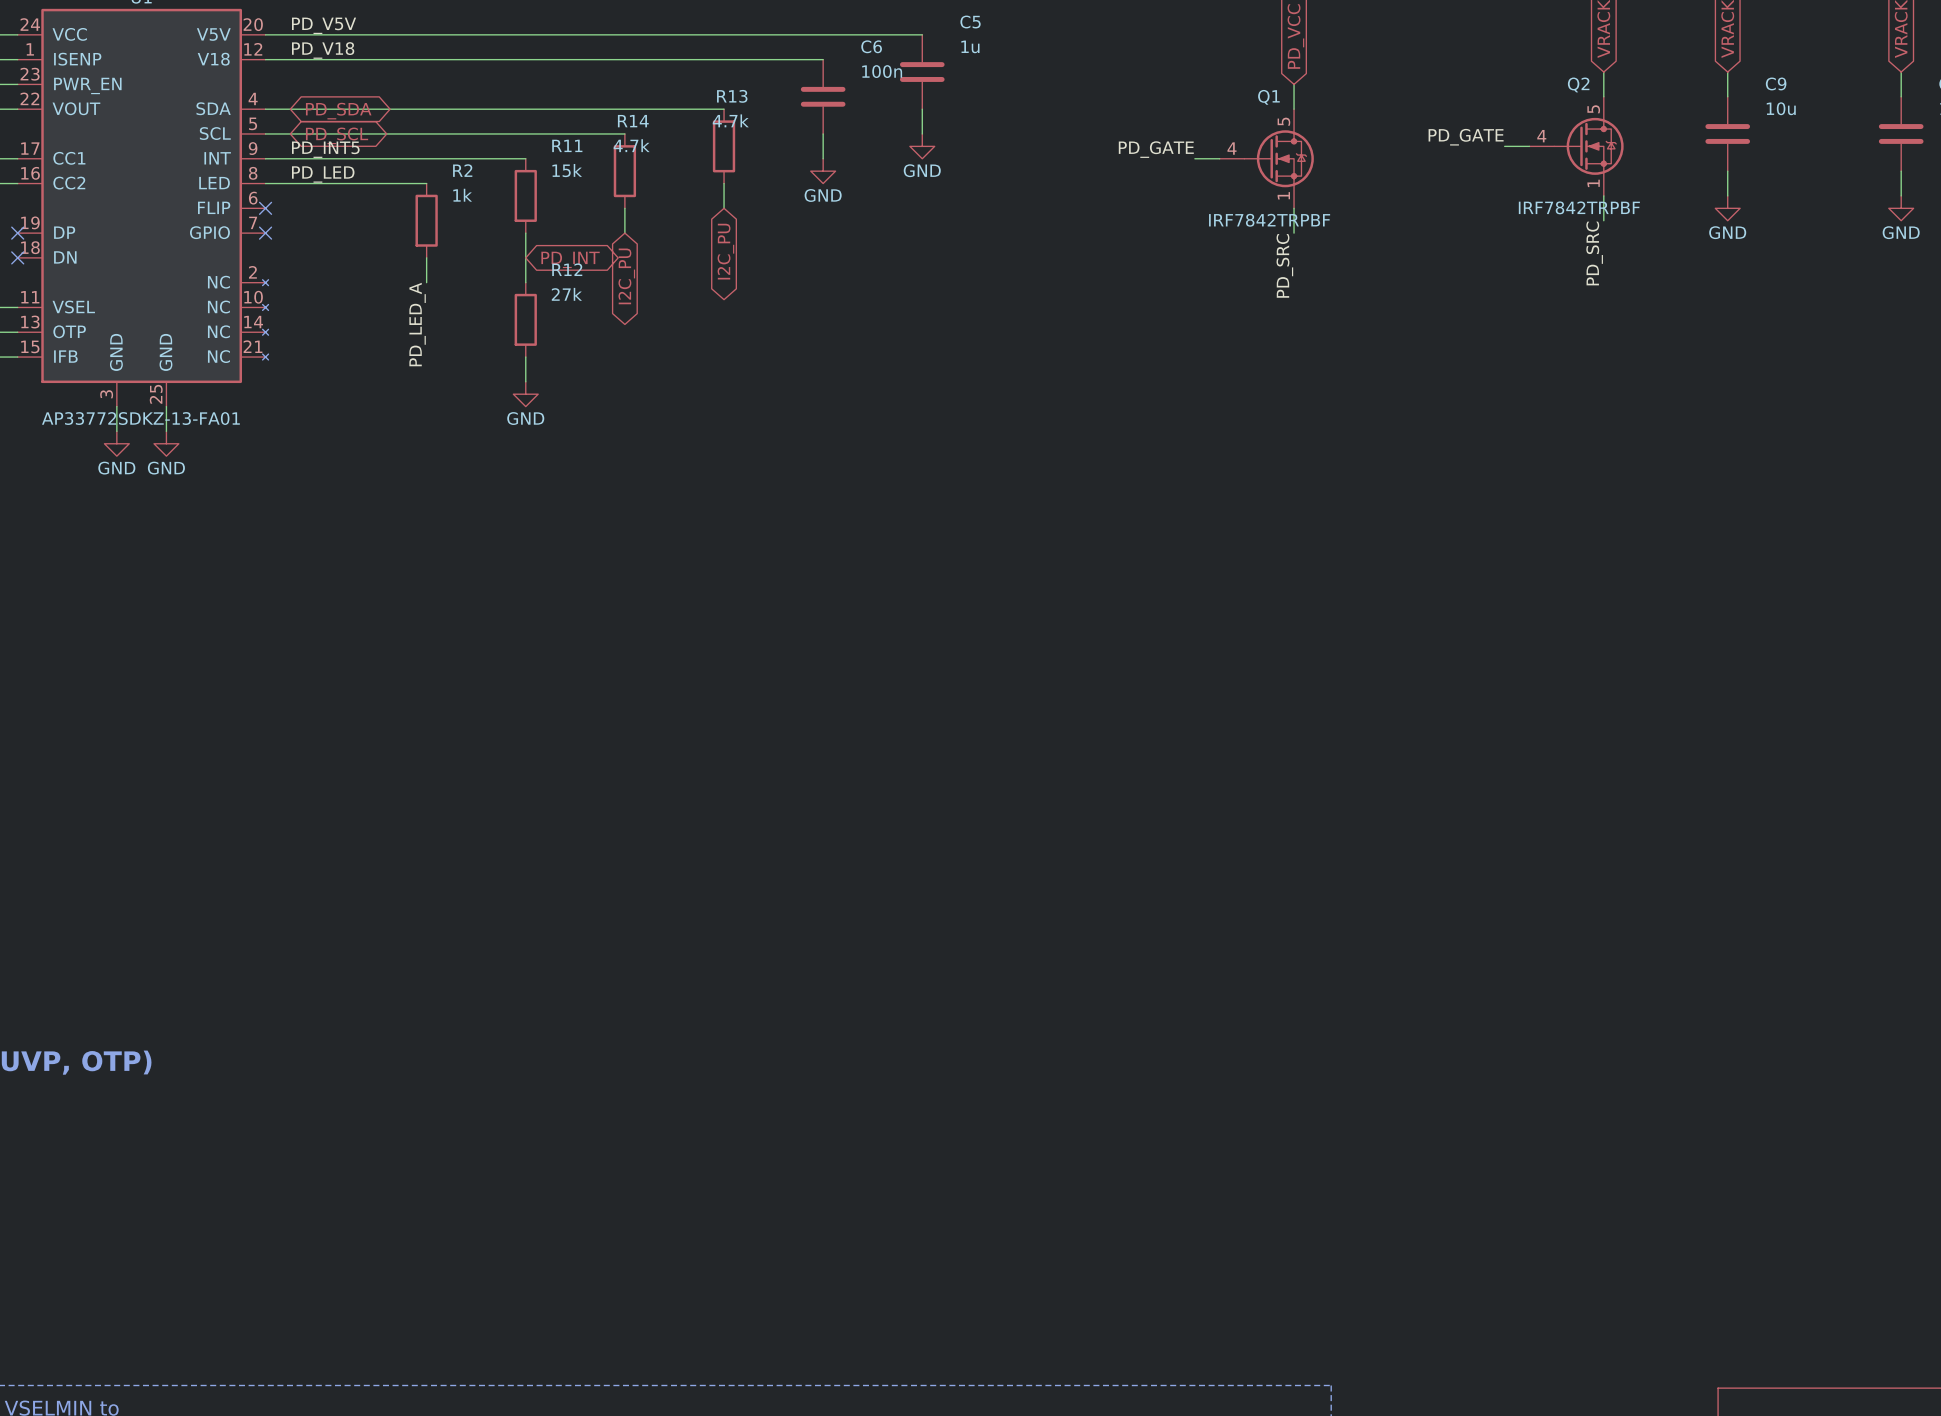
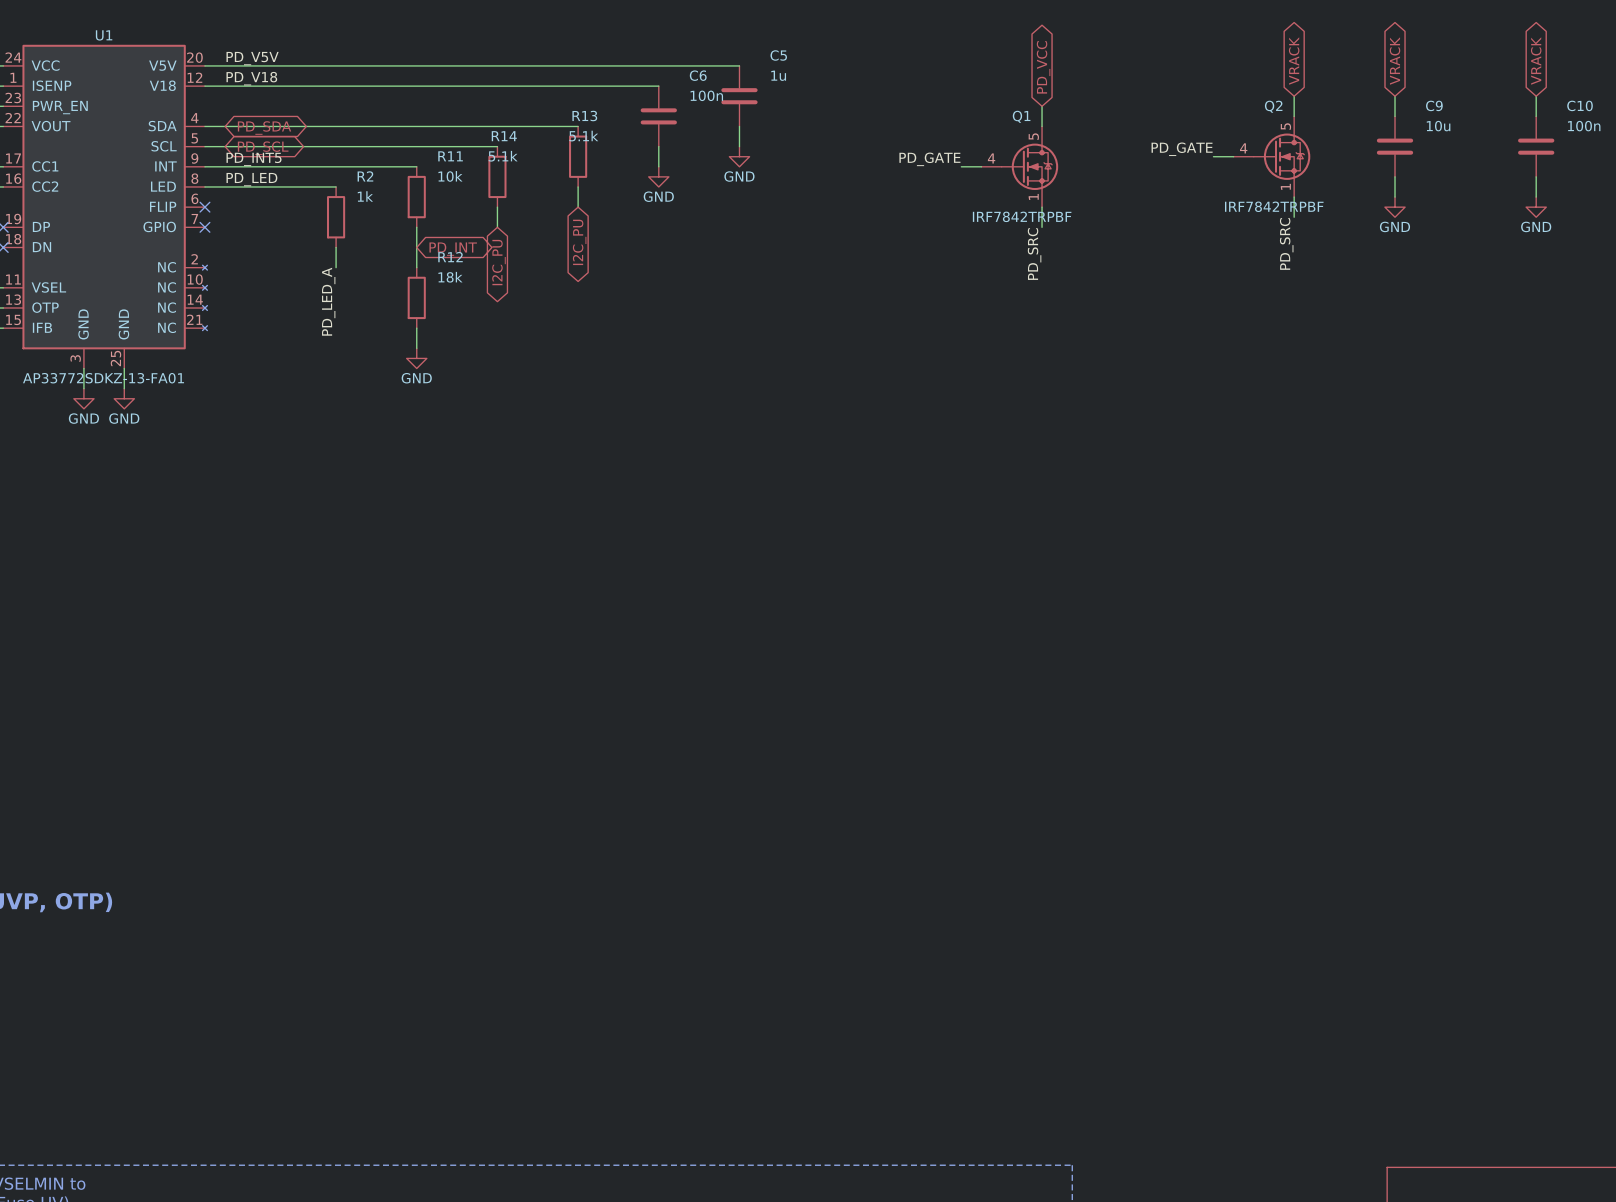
R13 value: 4.7k (730, 120) -> 5.1k (583, 136)
R14 value: 4.7k (631, 145) -> 5.1k (503, 156)
R11 value: 15k (567, 170) -> 10k (450, 176)
R12 value: 27k (566, 294) -> 18k (450, 277)

